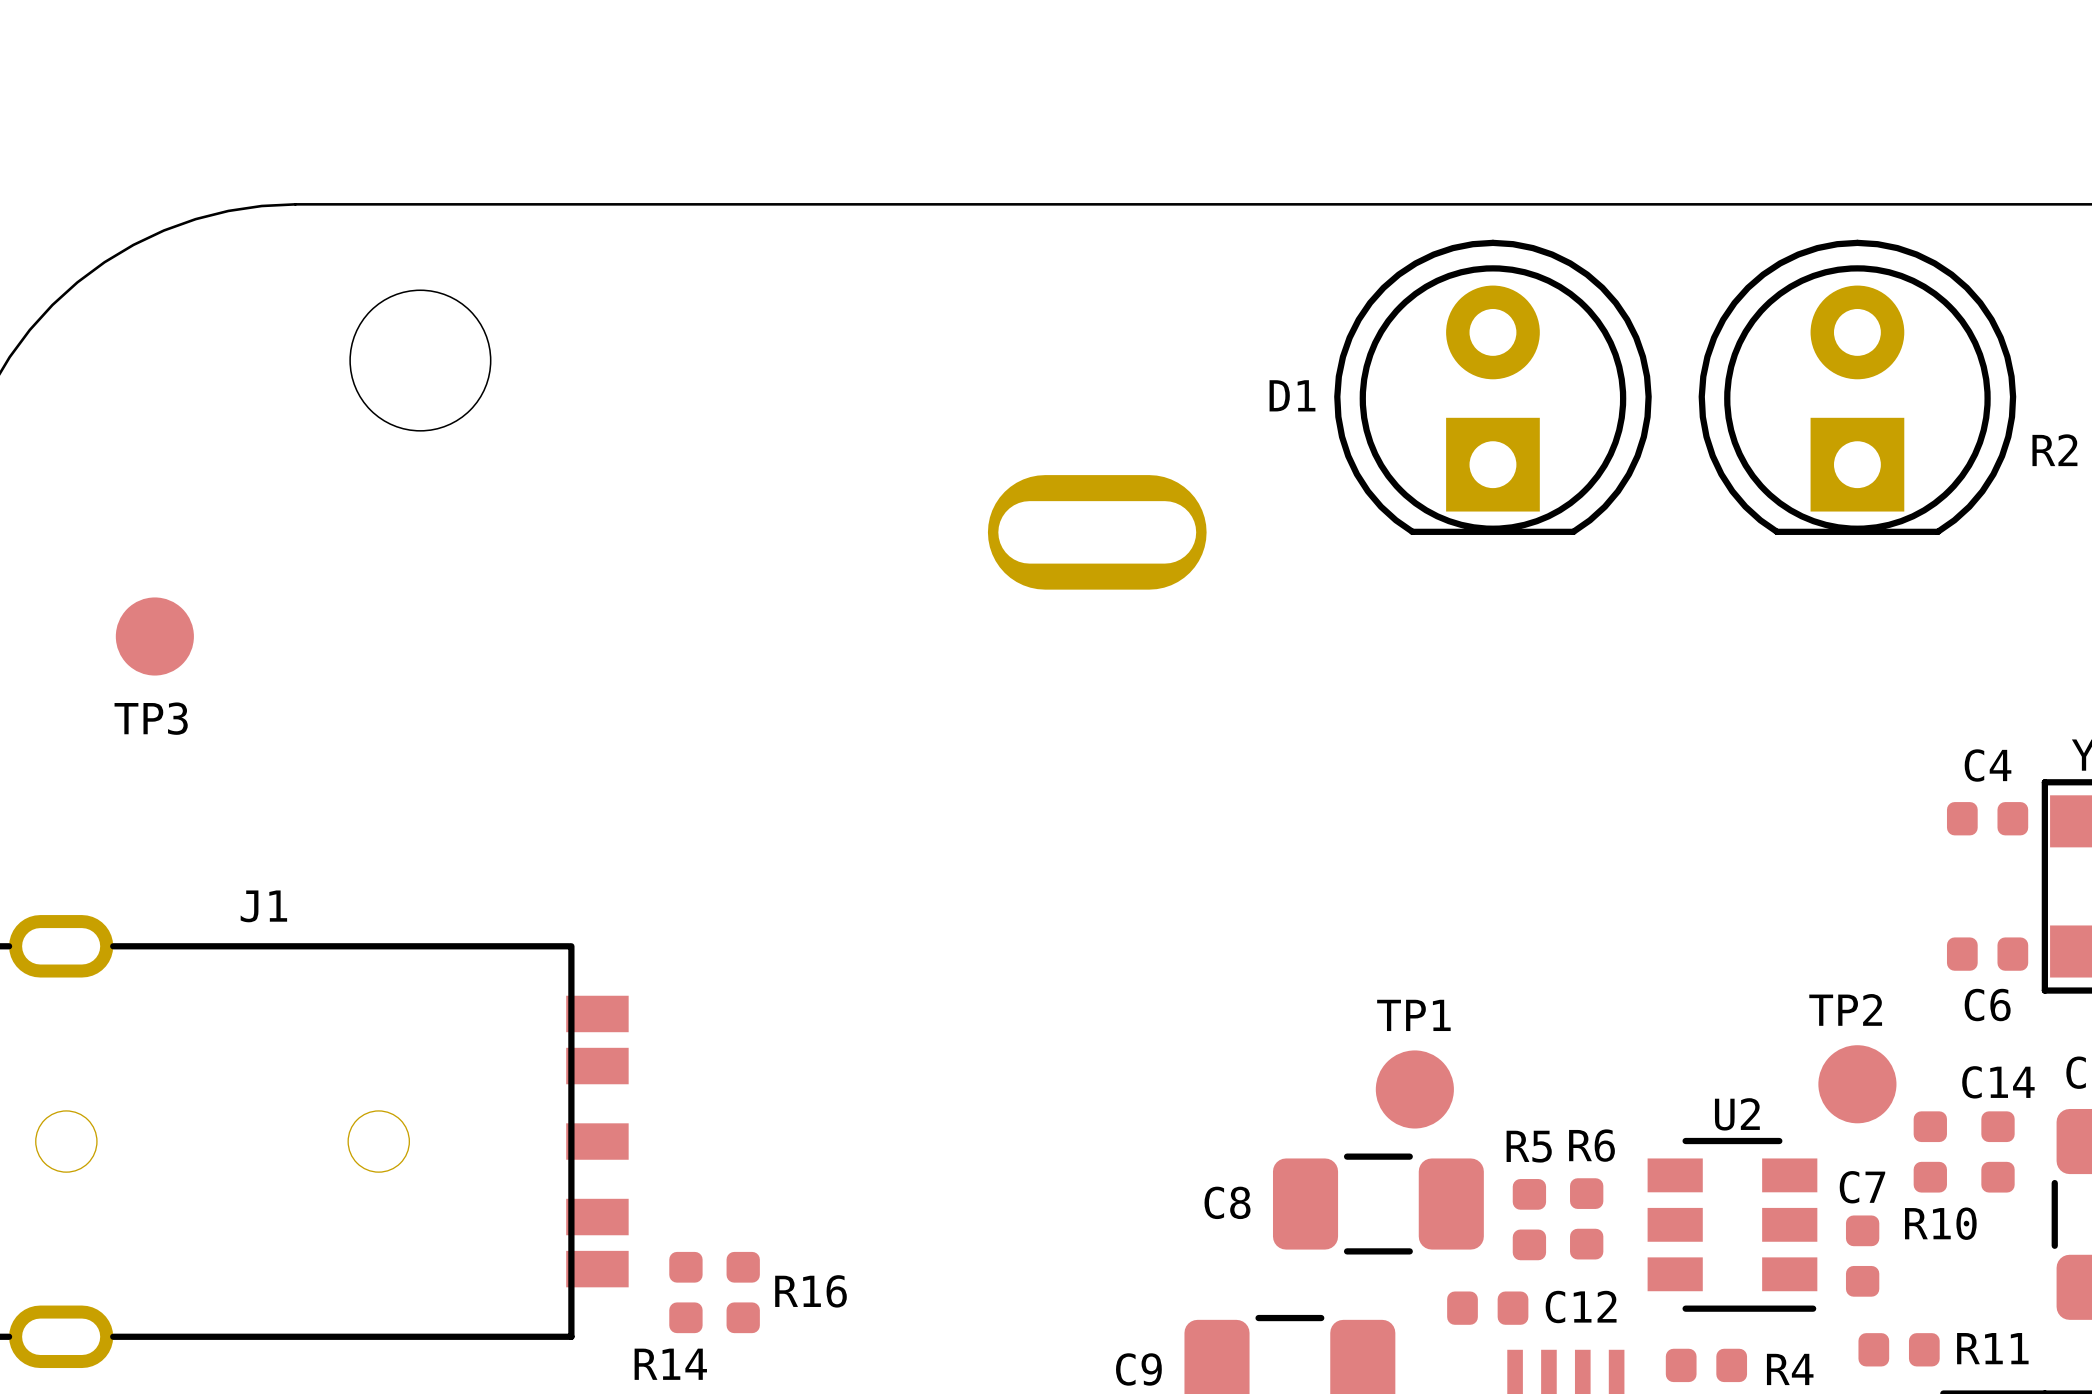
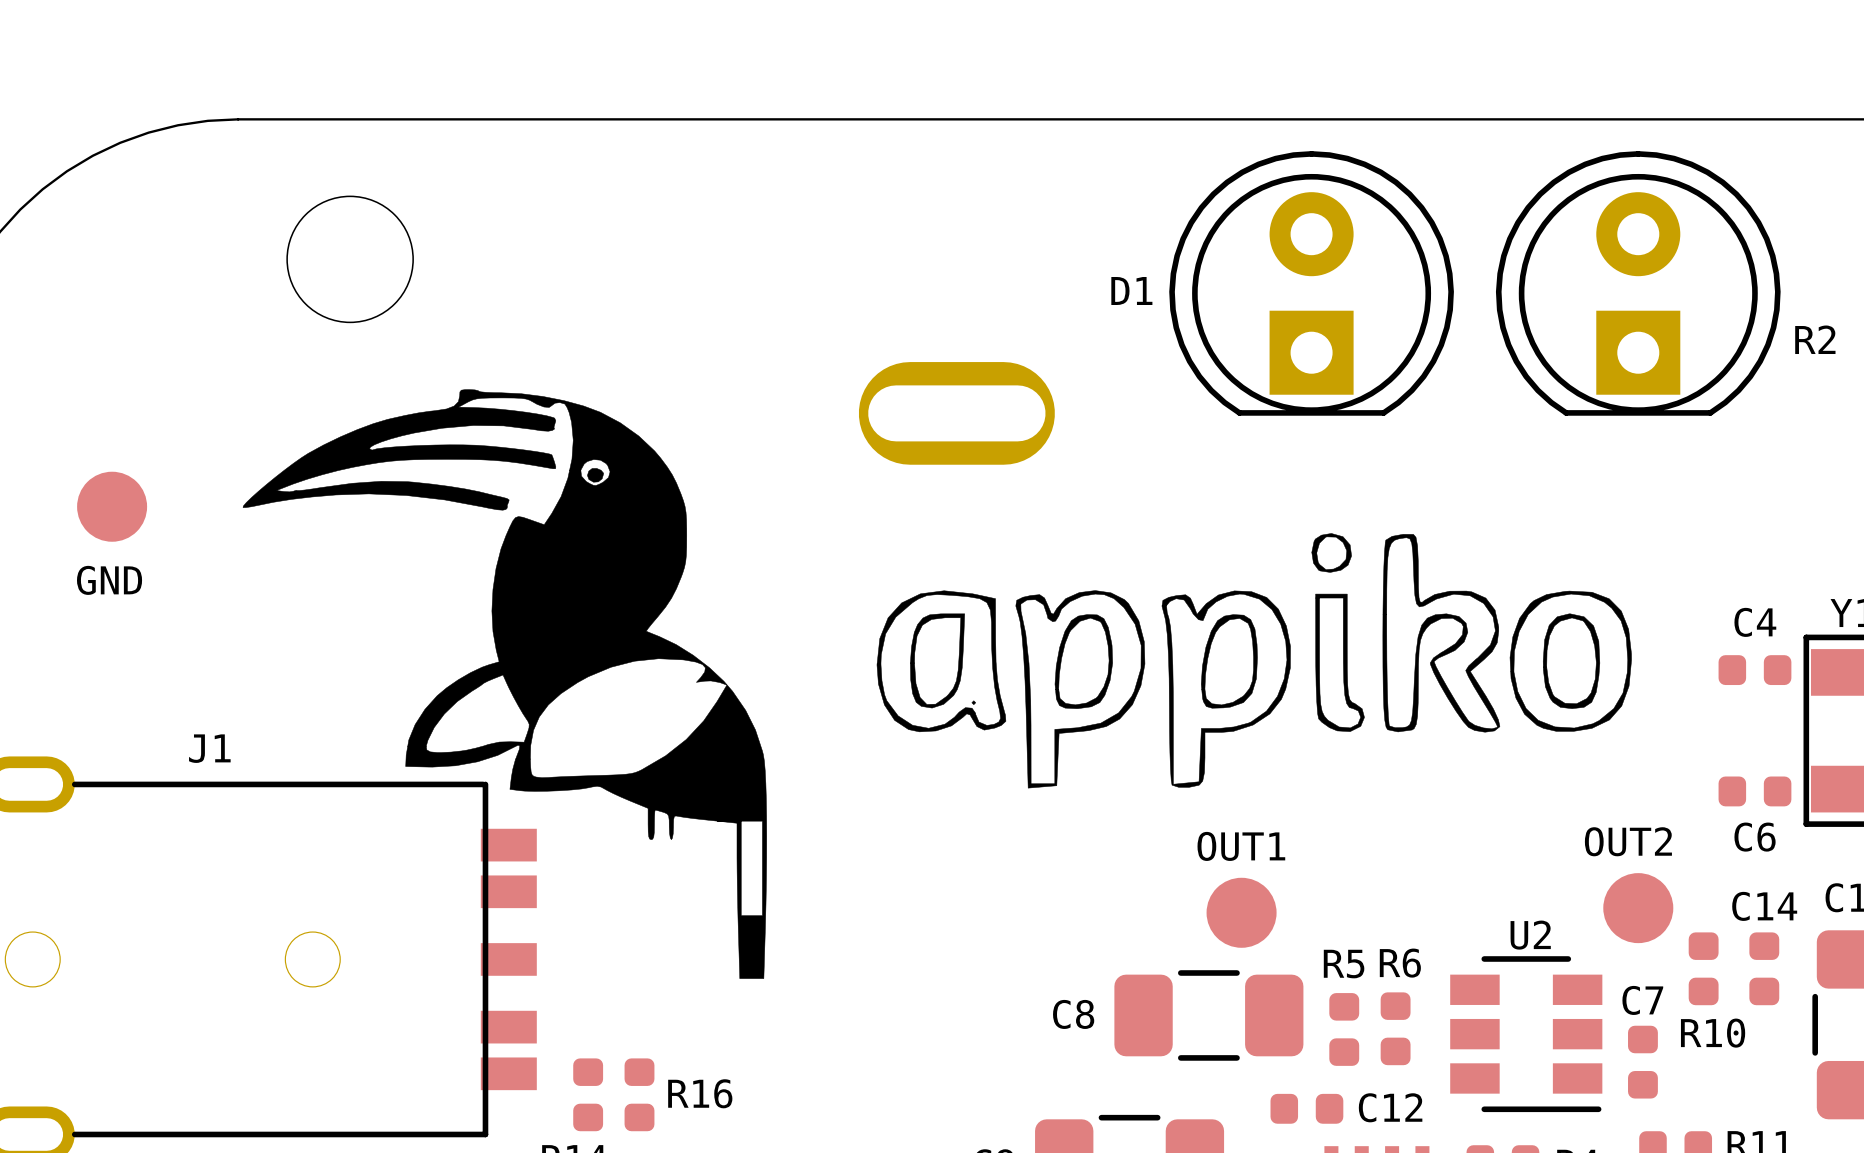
drawing: none -> [242, 389, 767, 979]
drawing: none -> [876, 533, 1632, 789]
TP3 name: TP3 (151, 718) -> GND (109, 580)
TP2 name: TP2 (1845, 1009) -> OUT2 (1628, 841)
TP1 name: TP1 (1413, 1015) -> OUT1 (1241, 846)

